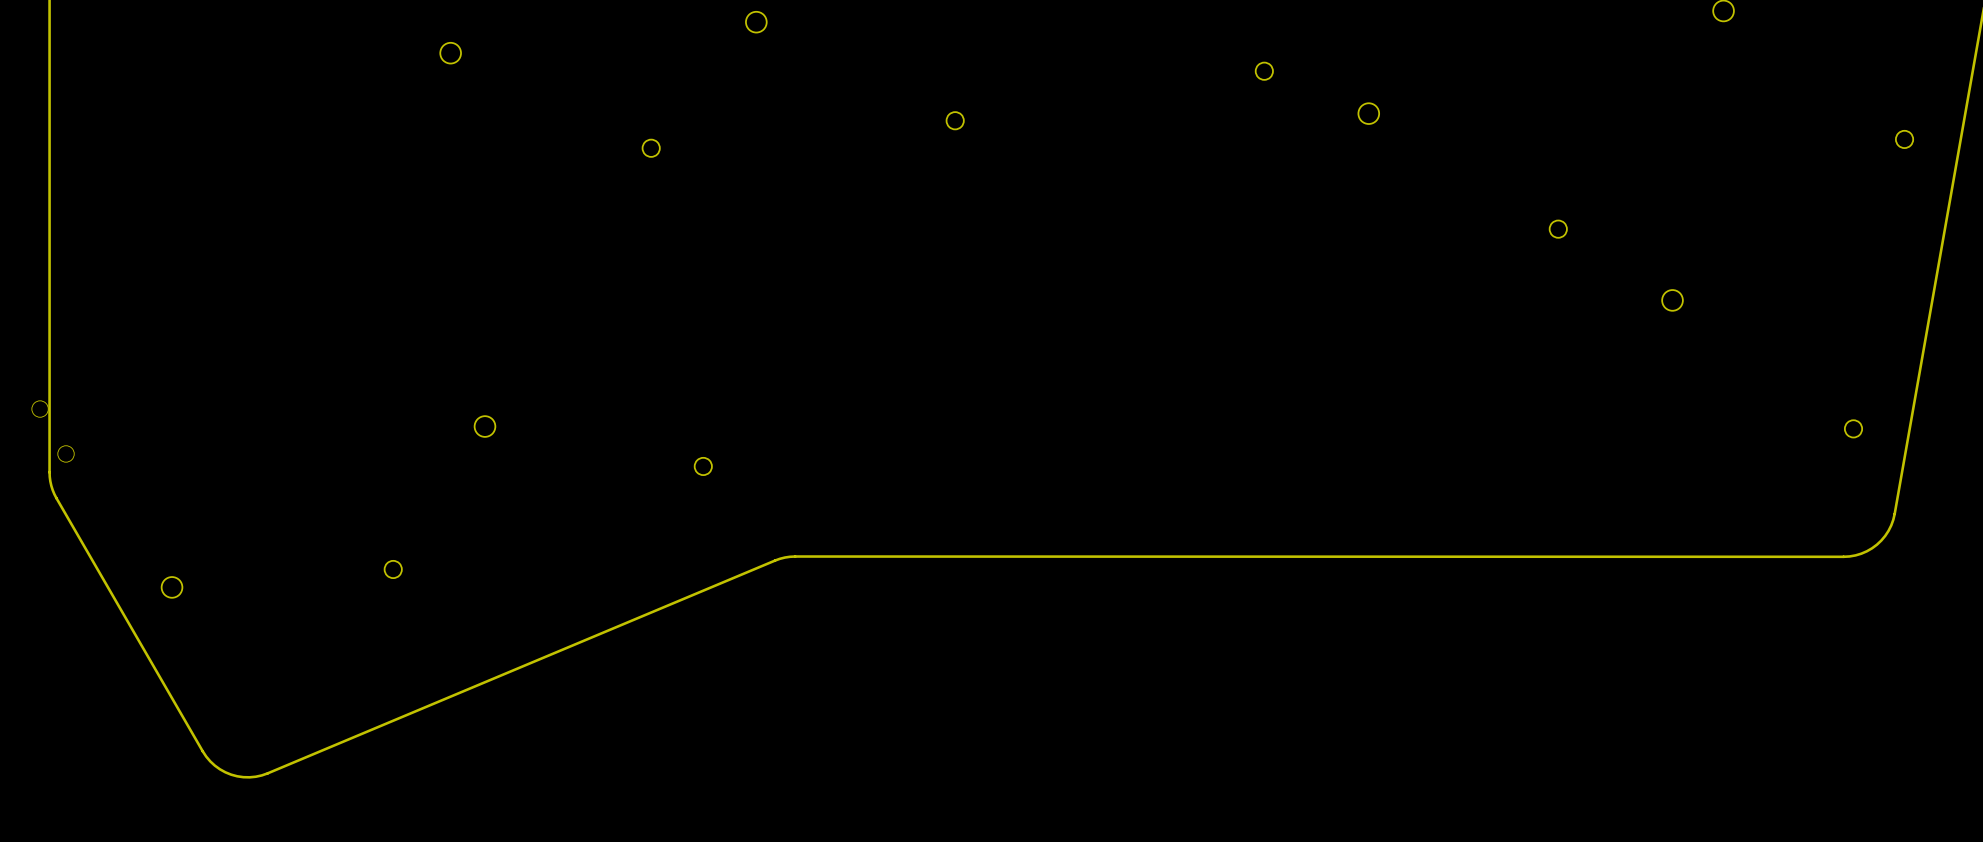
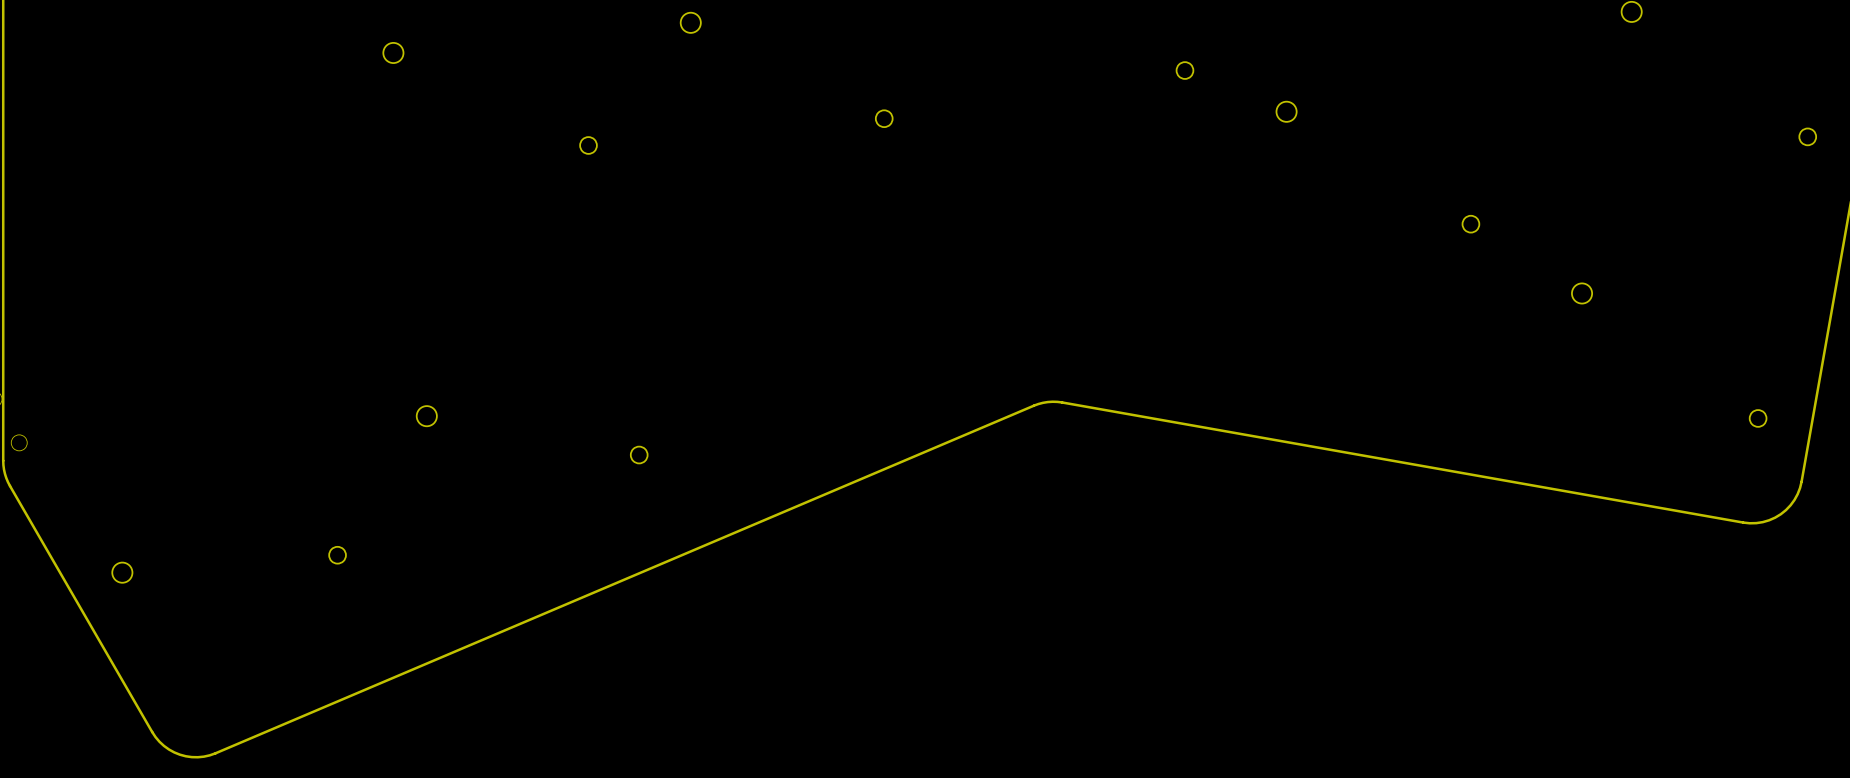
board edge: (1898, 493) (1893, 519) (1881, 540) (1861, 553) (1843, 556) (784, 557) (261, 775) (243, 777) (225, 772) (214, 765) (202, 751) -> (1801, 481) (1794, 499) (1780, 514) (1769, 520) (1749, 523) (1062, 402) (1047, 402) (1033, 405) (215, 753) (197, 757) (179, 754) (164, 745) (152, 732)

